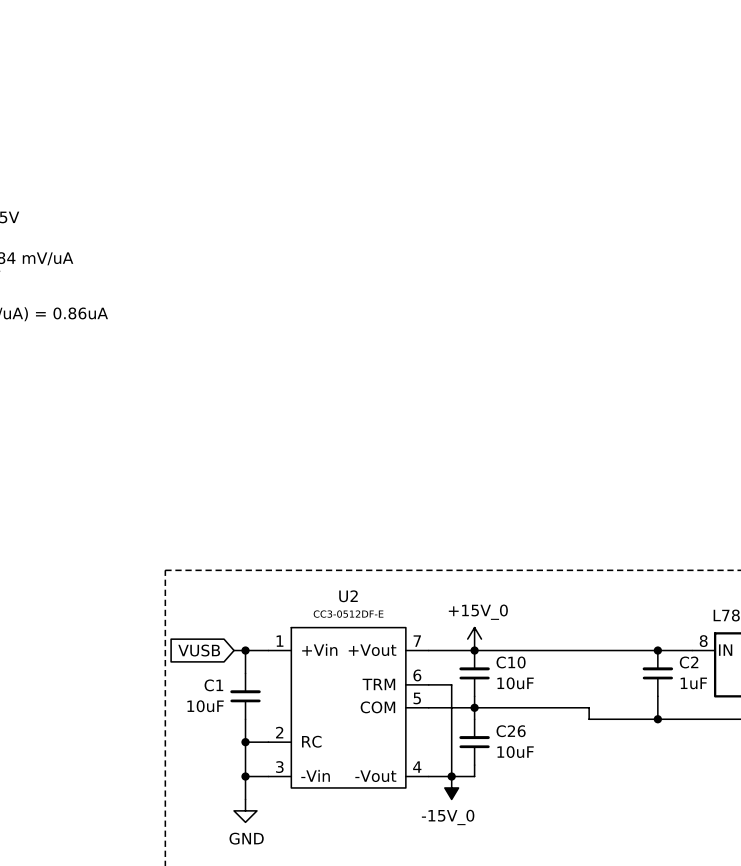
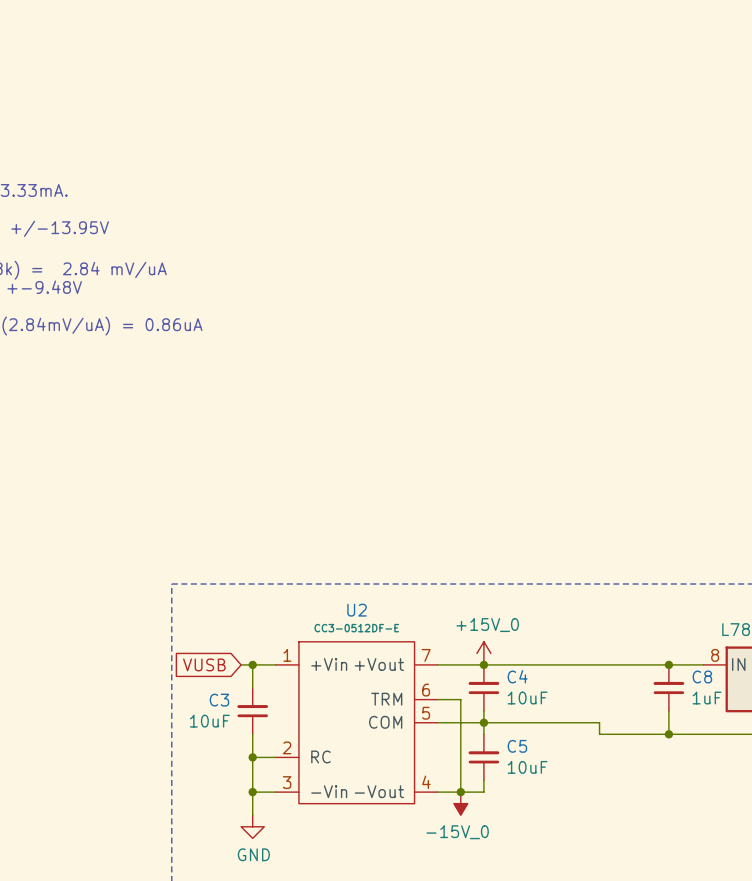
C10 name: C10 (511, 662) -> C4 (517, 676)
C2 name: C2 (689, 662) -> C8 (702, 676)
C1 name: C1 (213, 685) -> C3 (219, 700)
C26 name: C26 (511, 731) -> C5 (517, 746)

